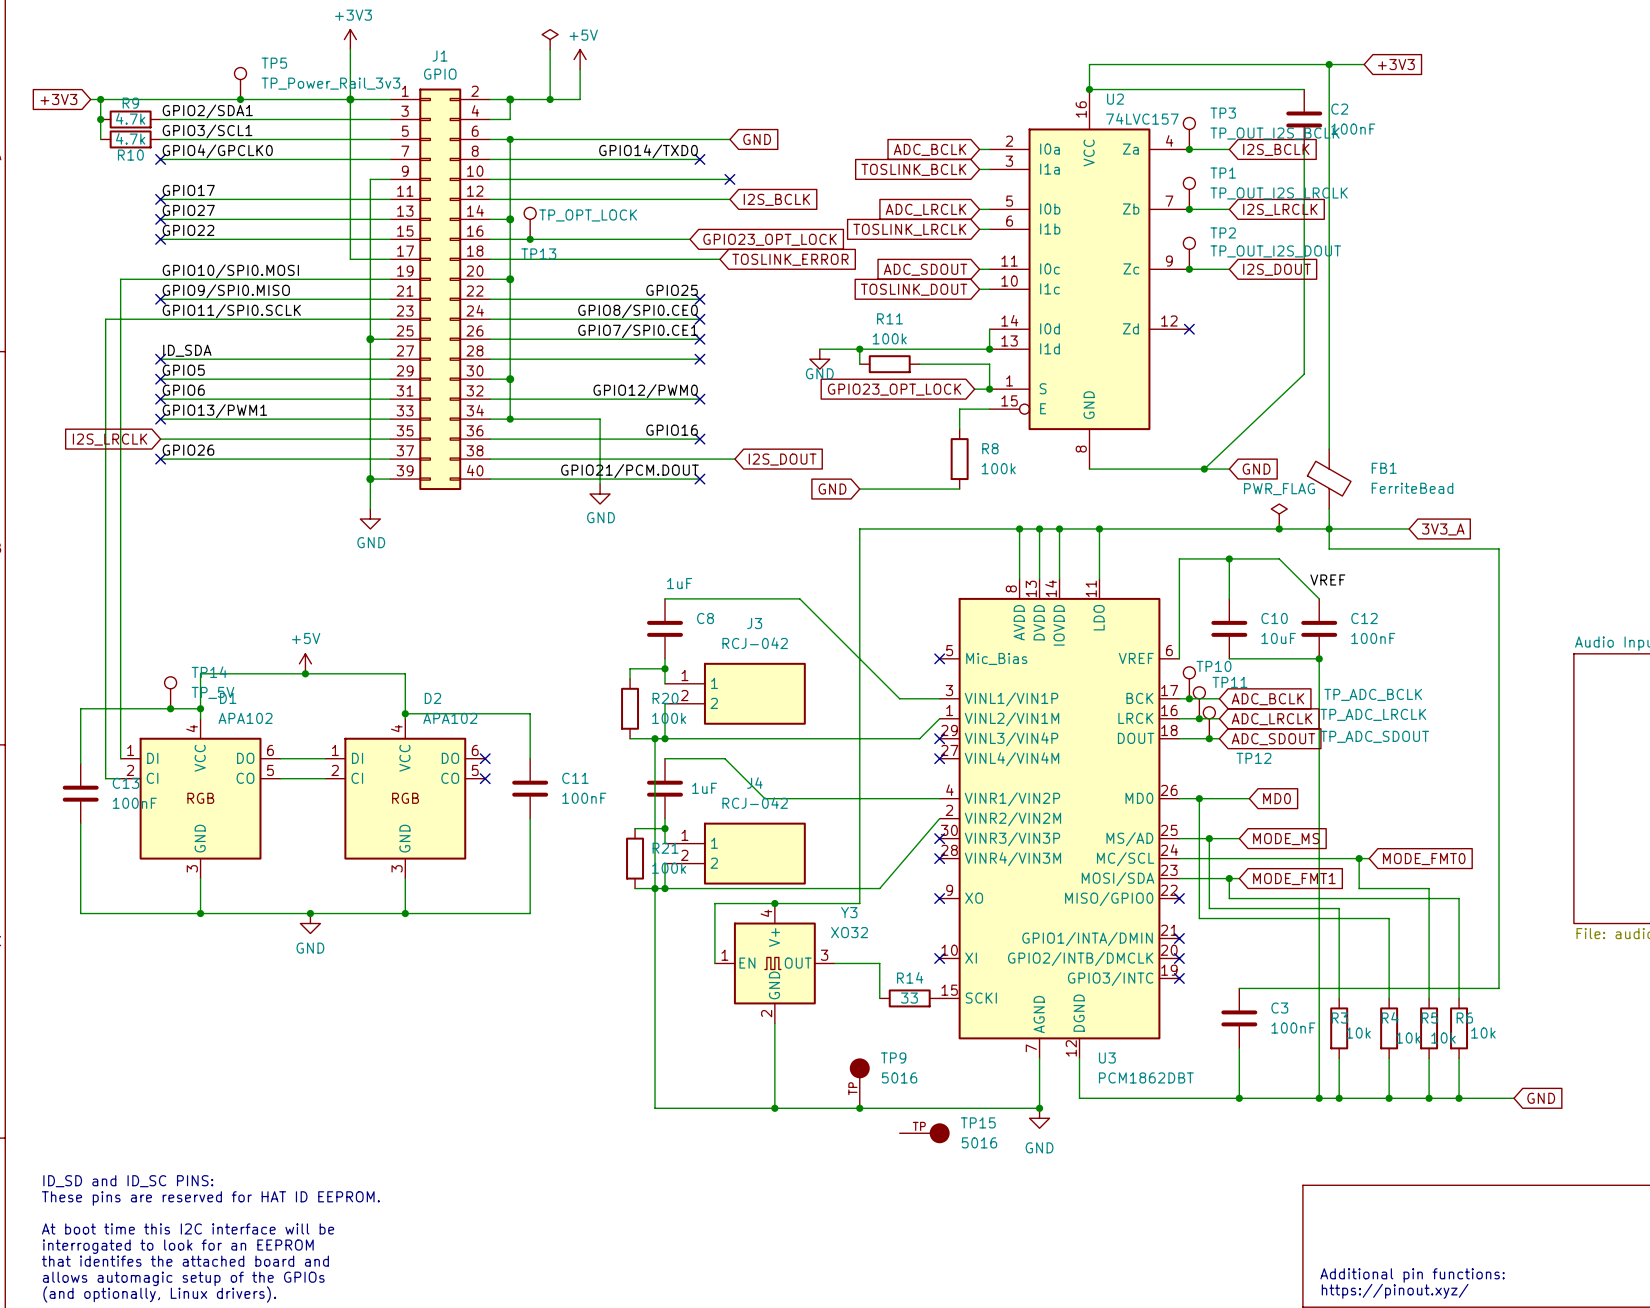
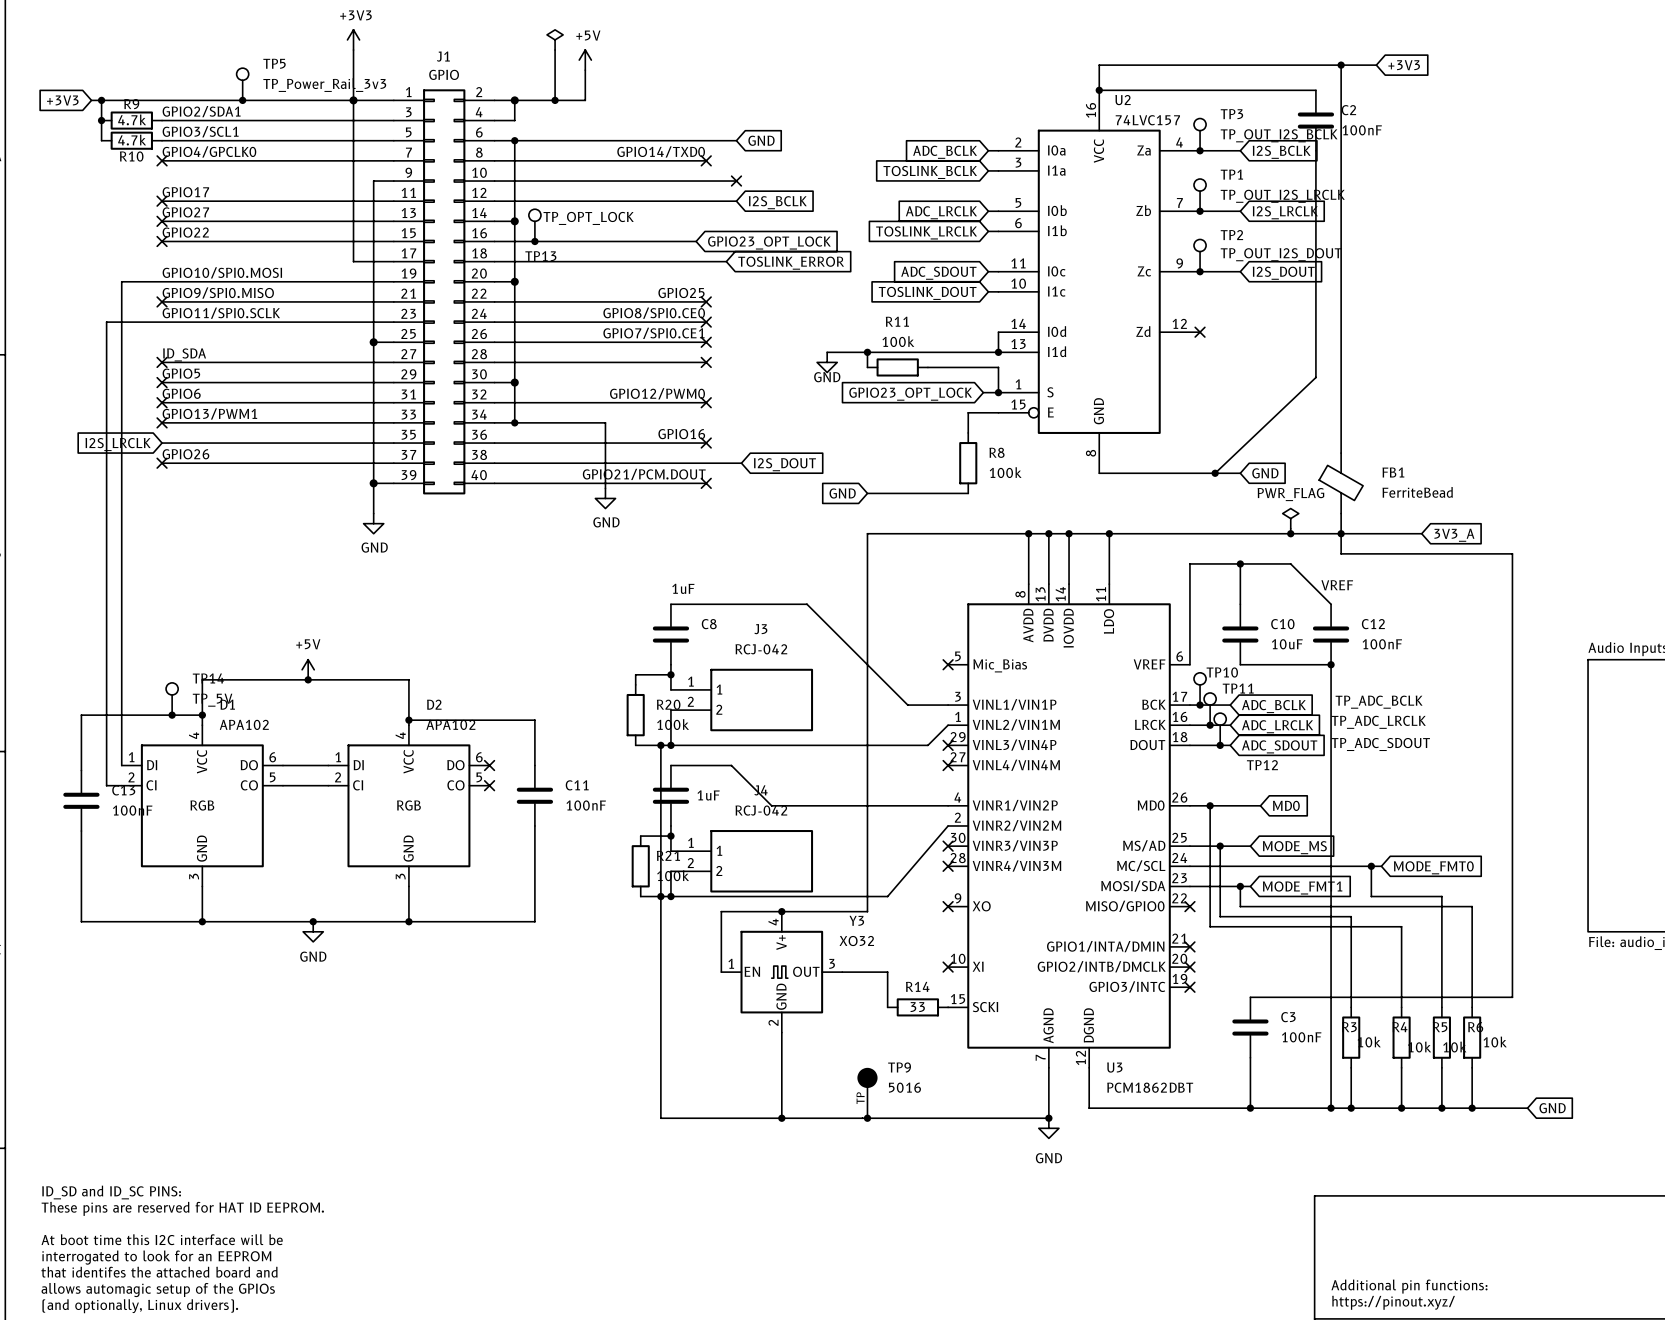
TP15: 5016 (924, 1133) -> none

